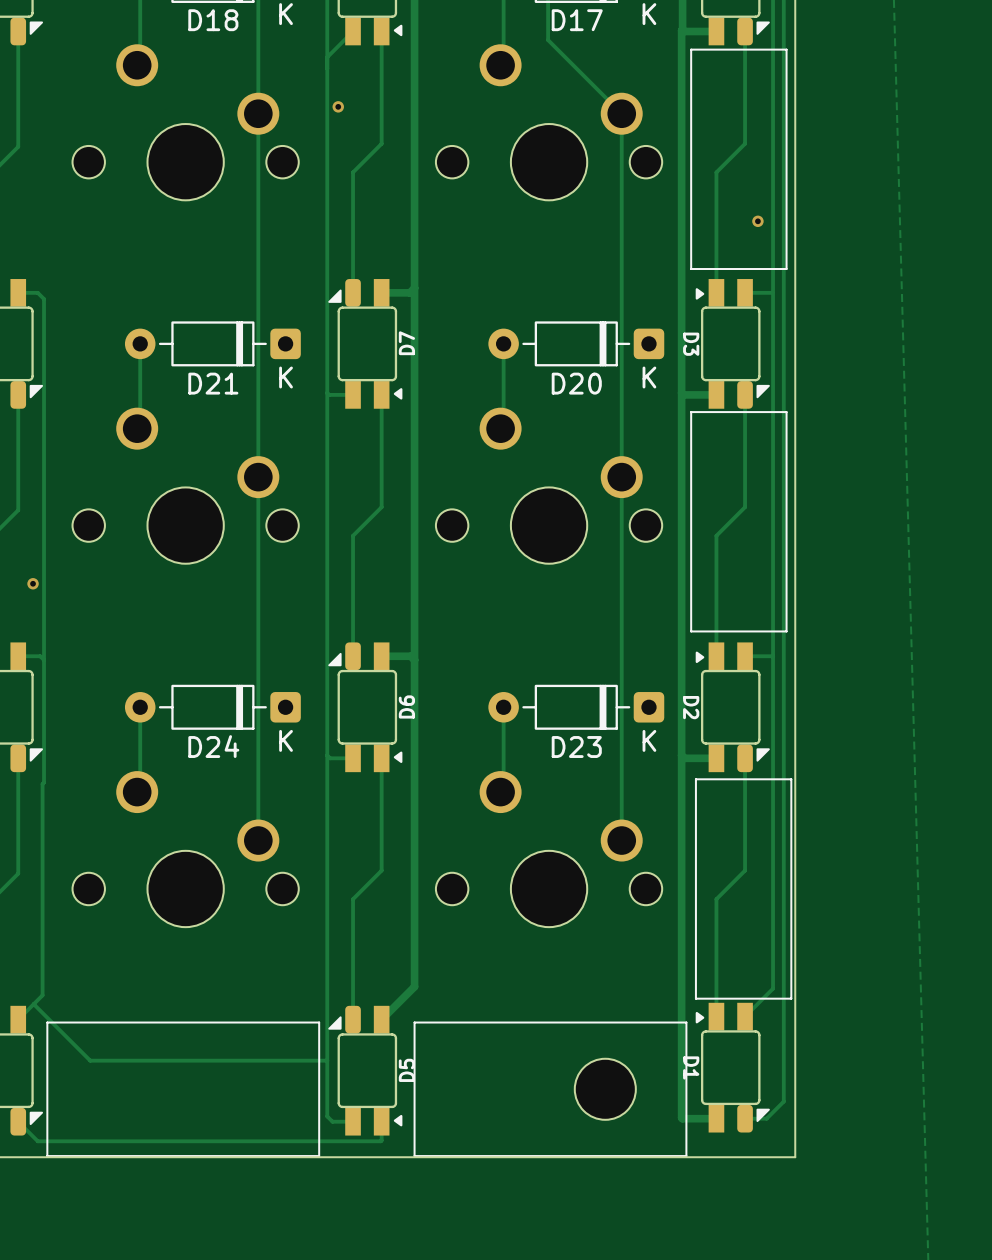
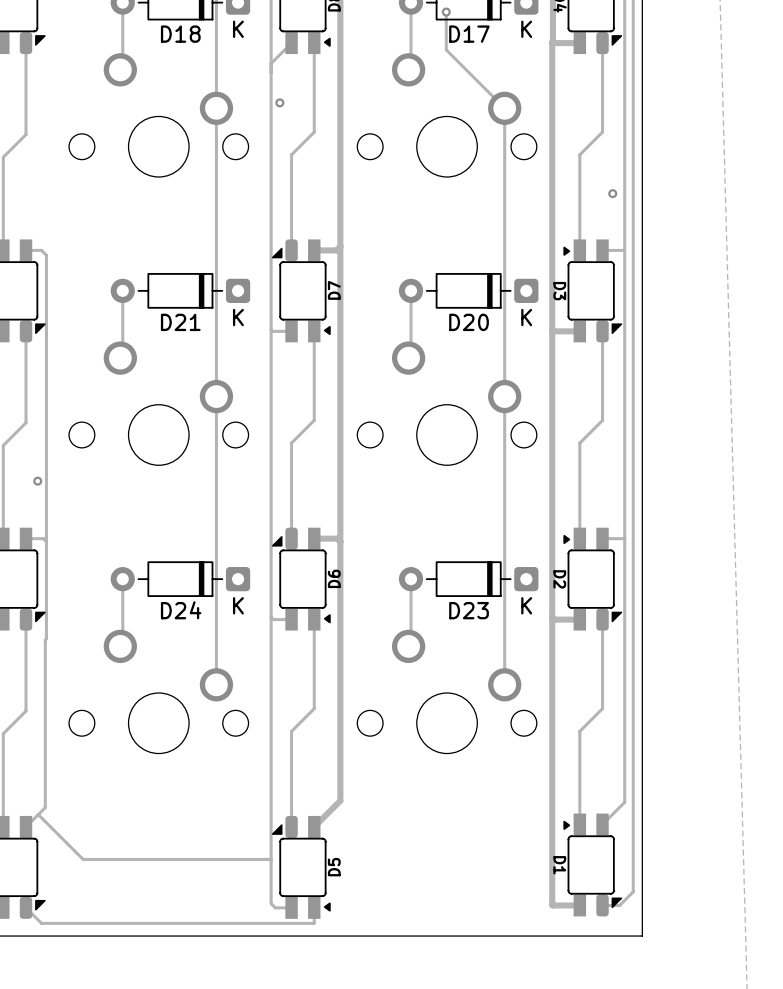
line: (786, 49) (786, 269) (691, 269) (691, 49) (786, 49) -> none
line: (786, 412) (691, 412) (691, 631) (786, 631) (786, 412) -> none
line: (791, 779) (695, 779) (695, 998) (791, 998) (791, 779) -> none
line: (319, 1022) (47, 1022) (47, 1156) (319, 1156) (319, 1022) -> none
line: (686, 1022) (414, 1022) (414, 1156) (686, 1156) (686, 1022) -> none
part: (605, 1089) -> none

